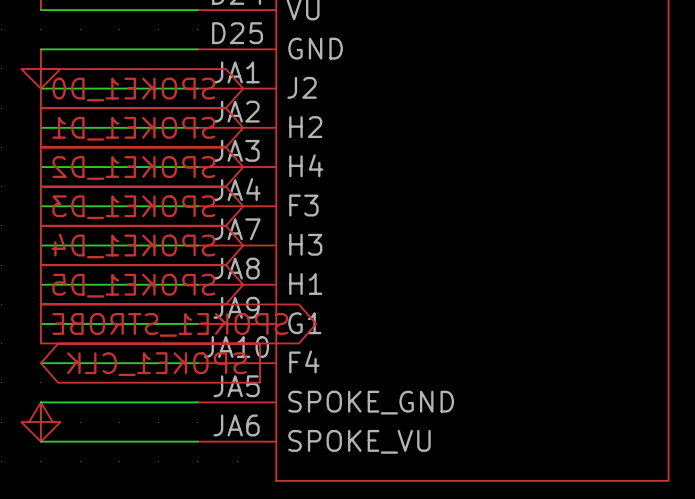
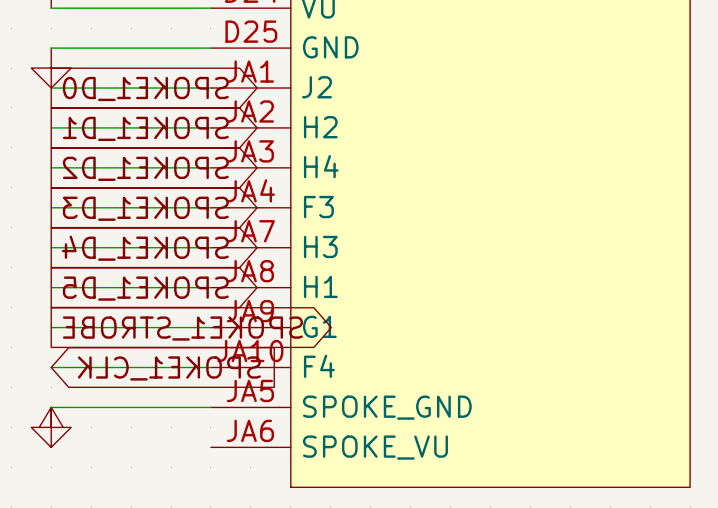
wire: (40, 441) (197, 441) -> none

